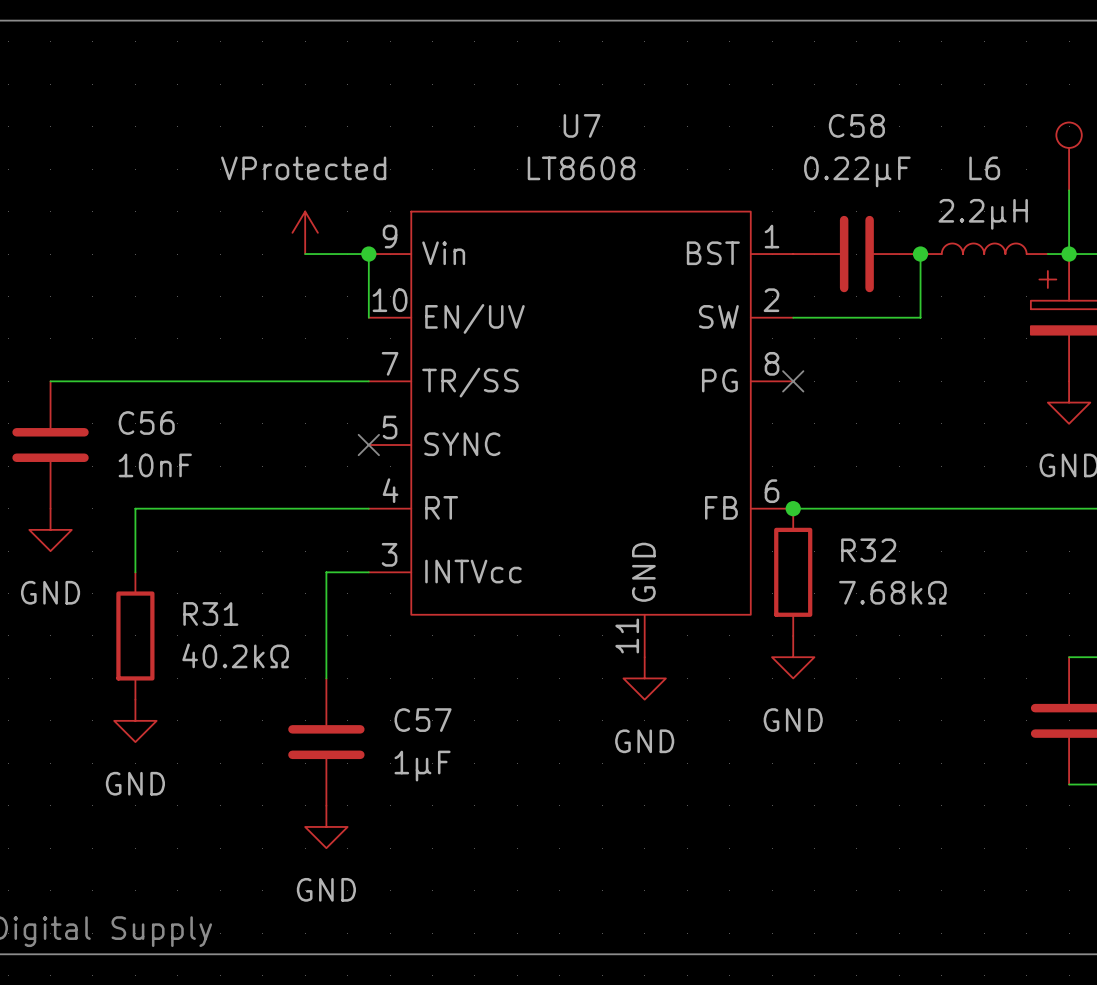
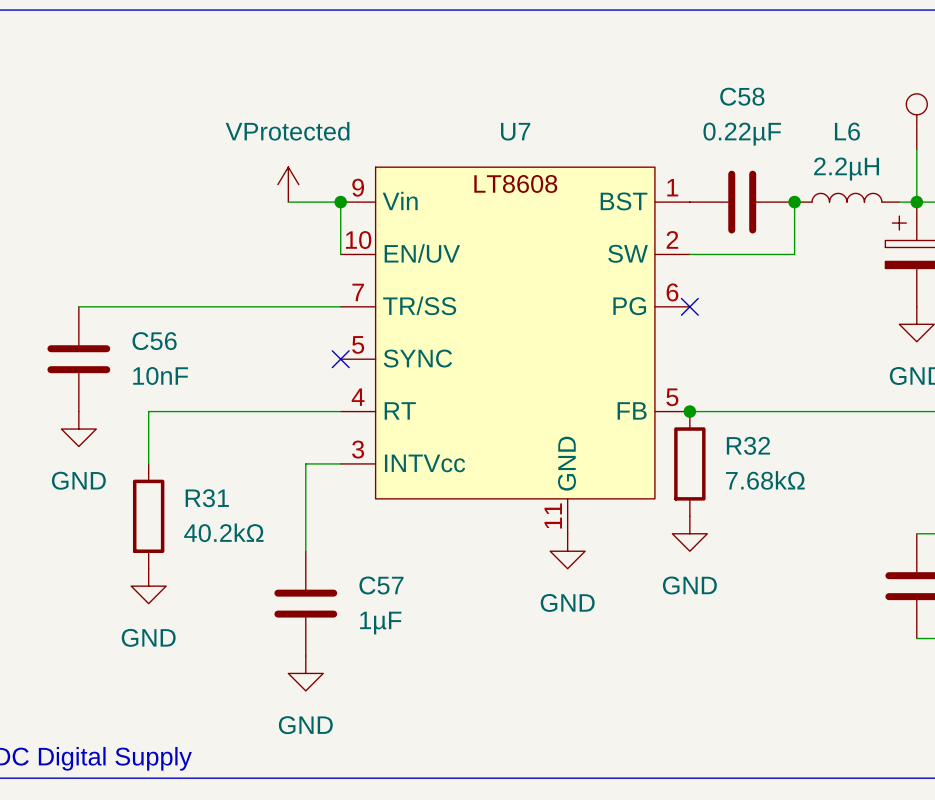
U7 name position: U7 (582, 125) -> U7 (515, 131)
U7 value: LT8608 (581, 168) -> none
U7 text: none -> LT8608 (515, 183)
U7 pin number: 8 (772, 363) -> 6 (672, 292)
U7 pin number: 6 (772, 491) -> 5 (672, 397)

